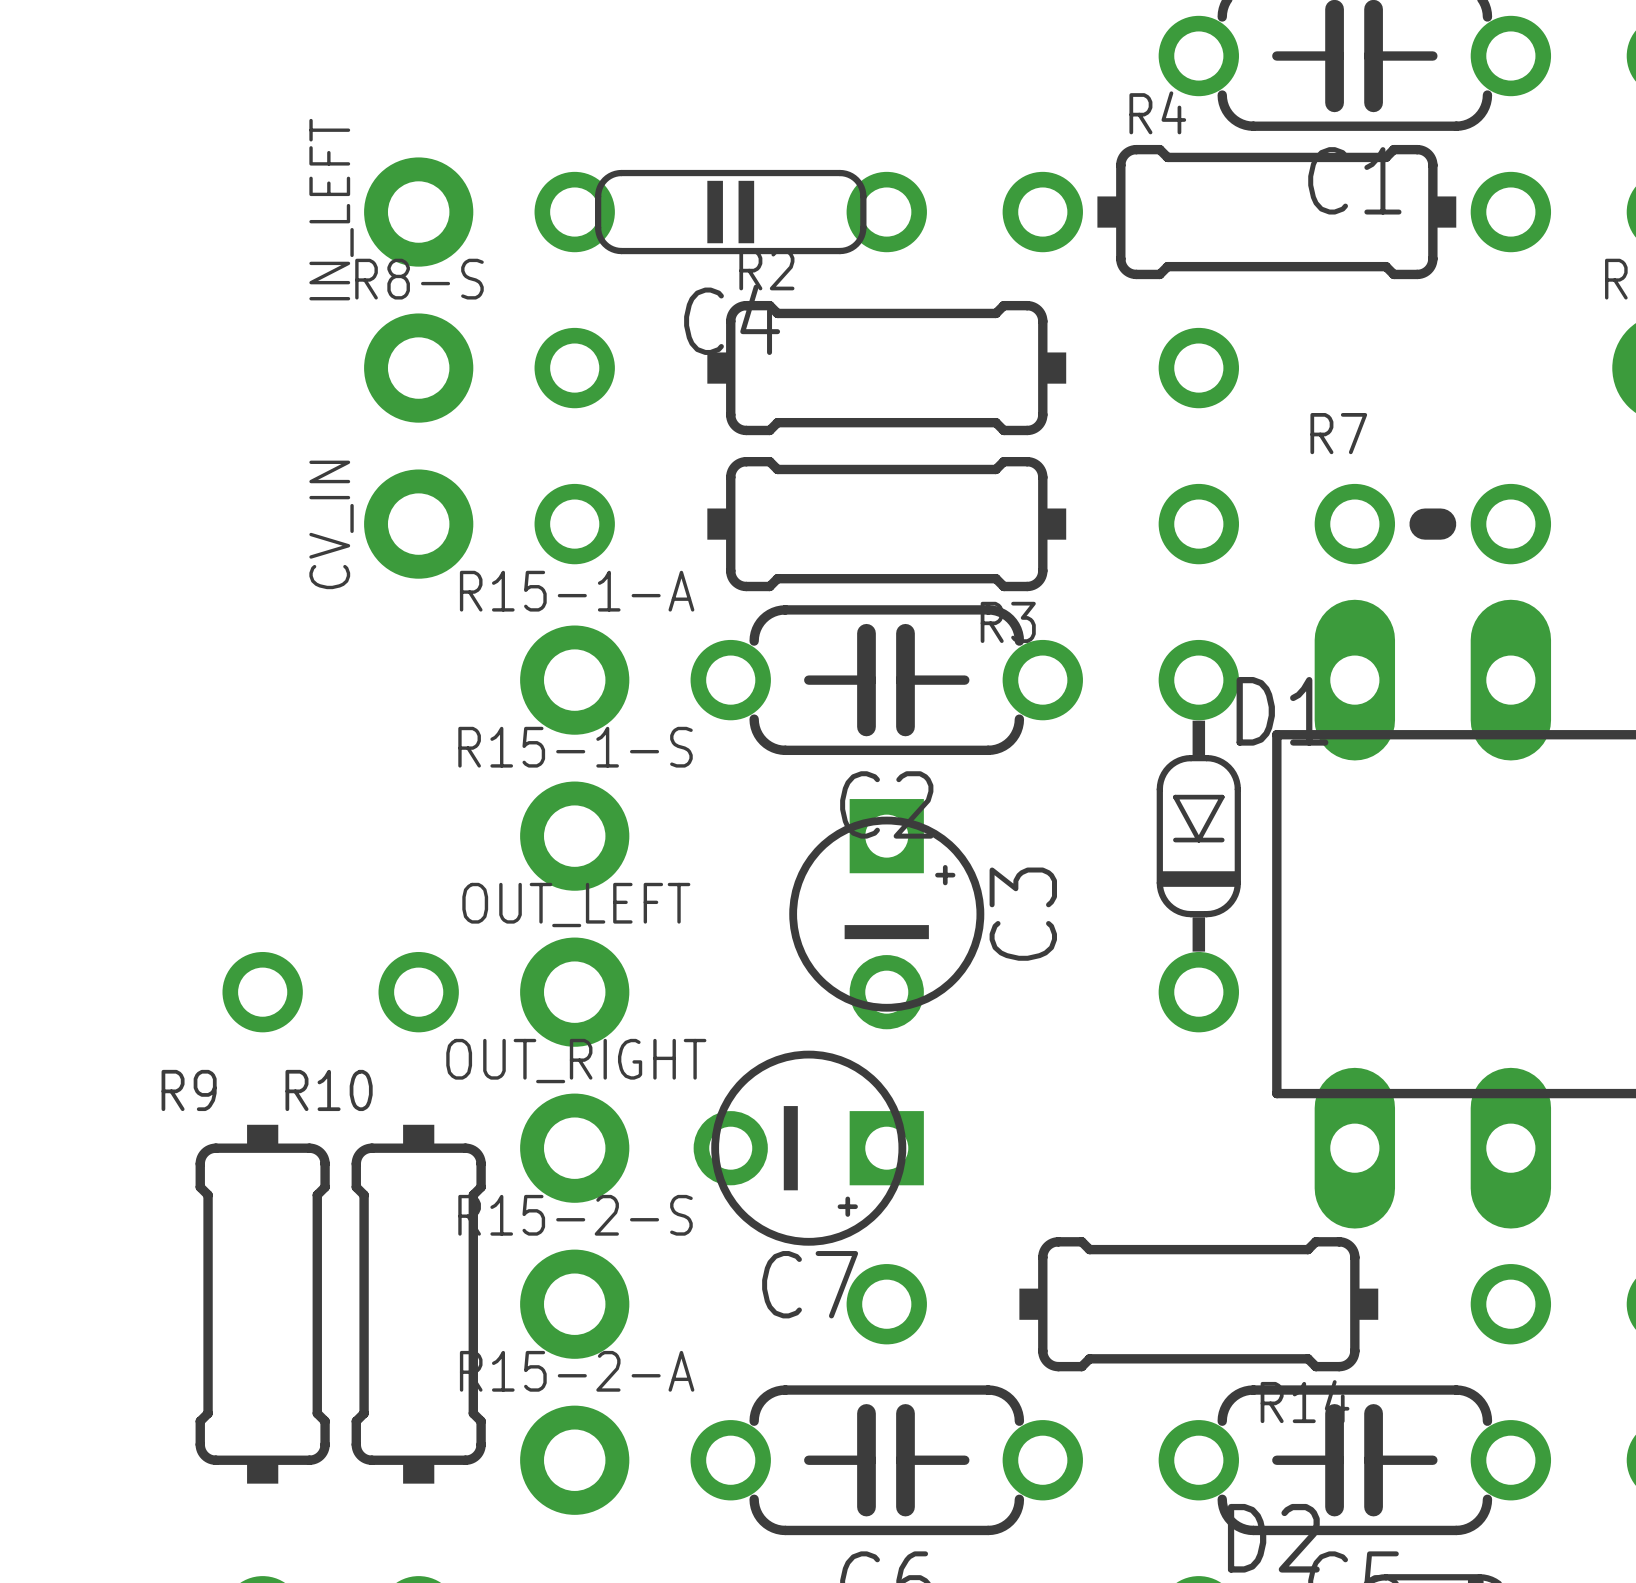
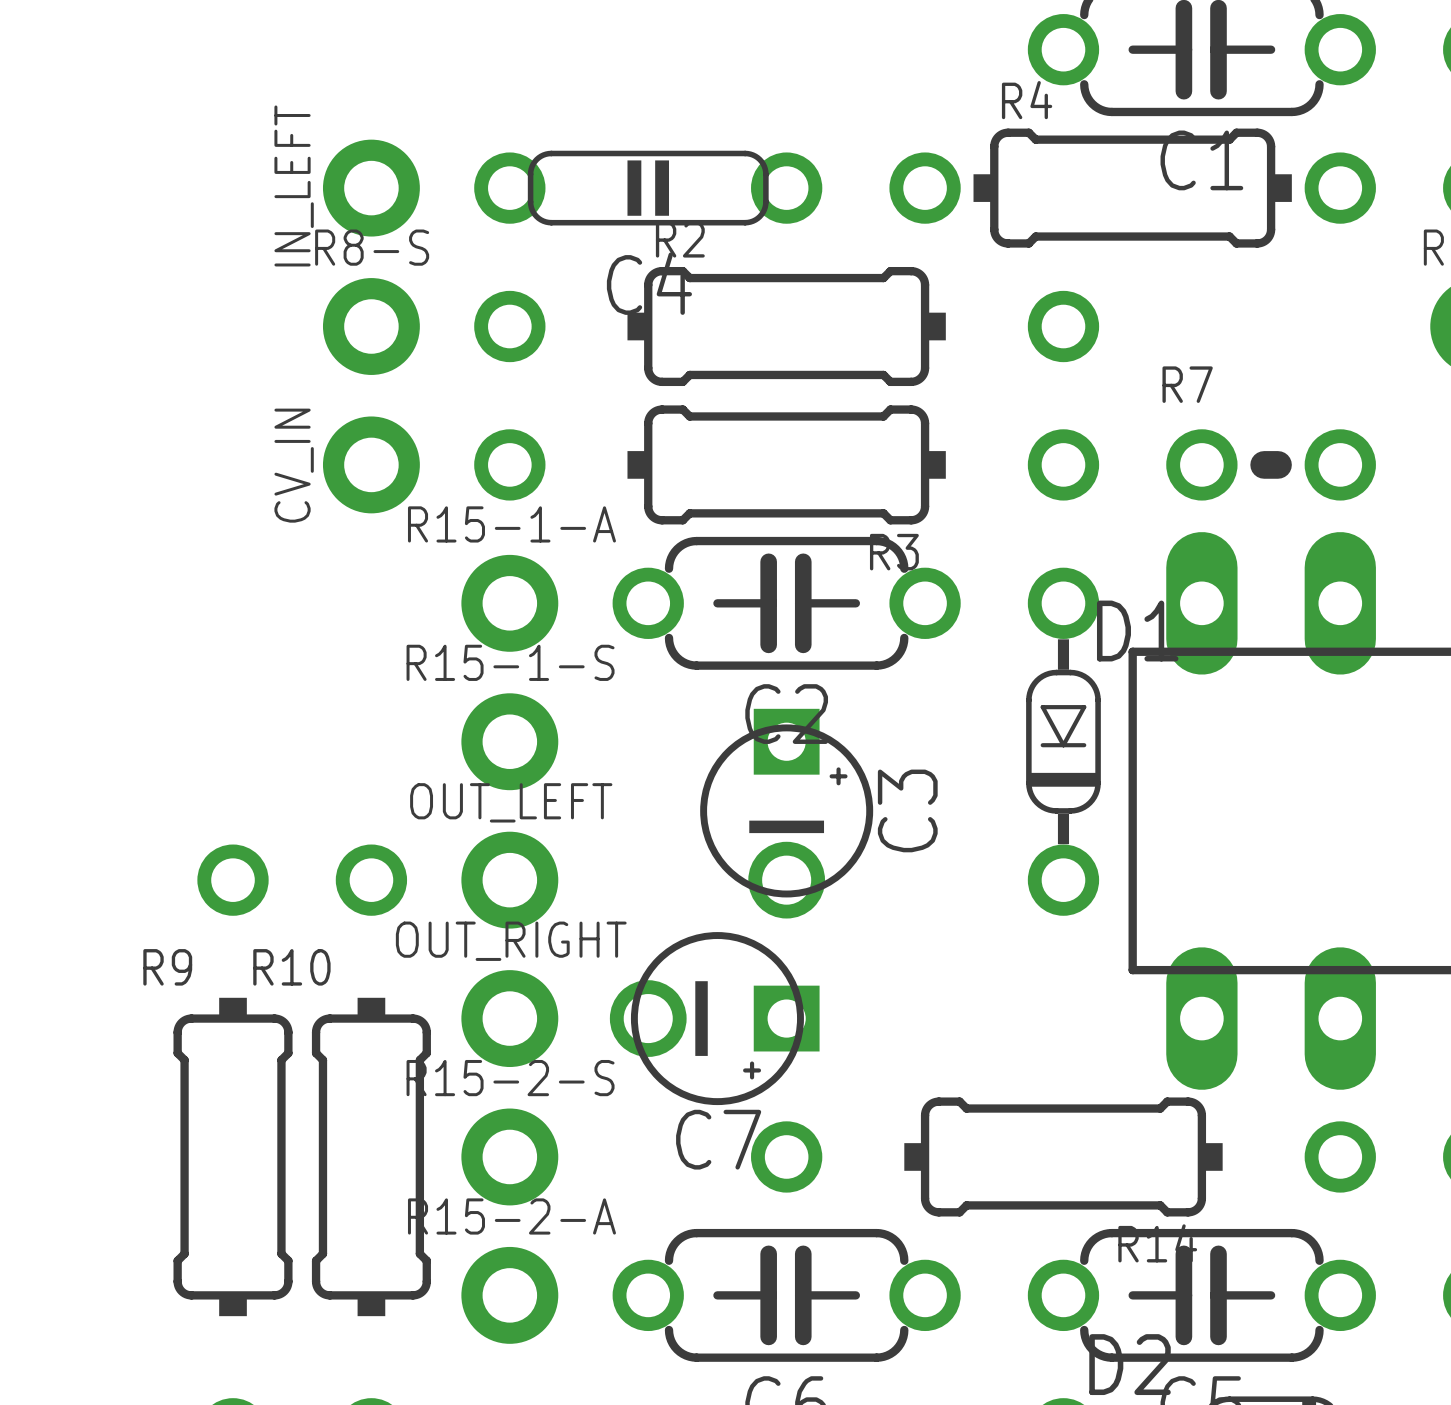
C3 footprint: [789, 799, 985, 1030] -> [700, 708, 874, 919]
C7 footprint: [693, 1050, 924, 1246] -> [609, 932, 820, 1106]

